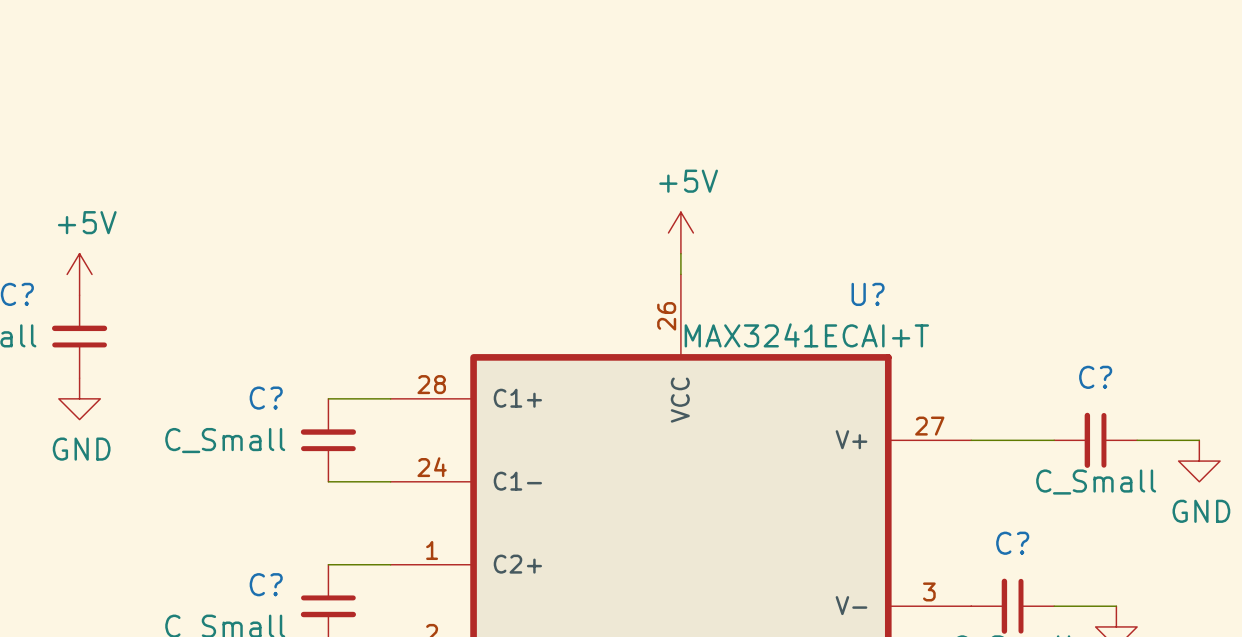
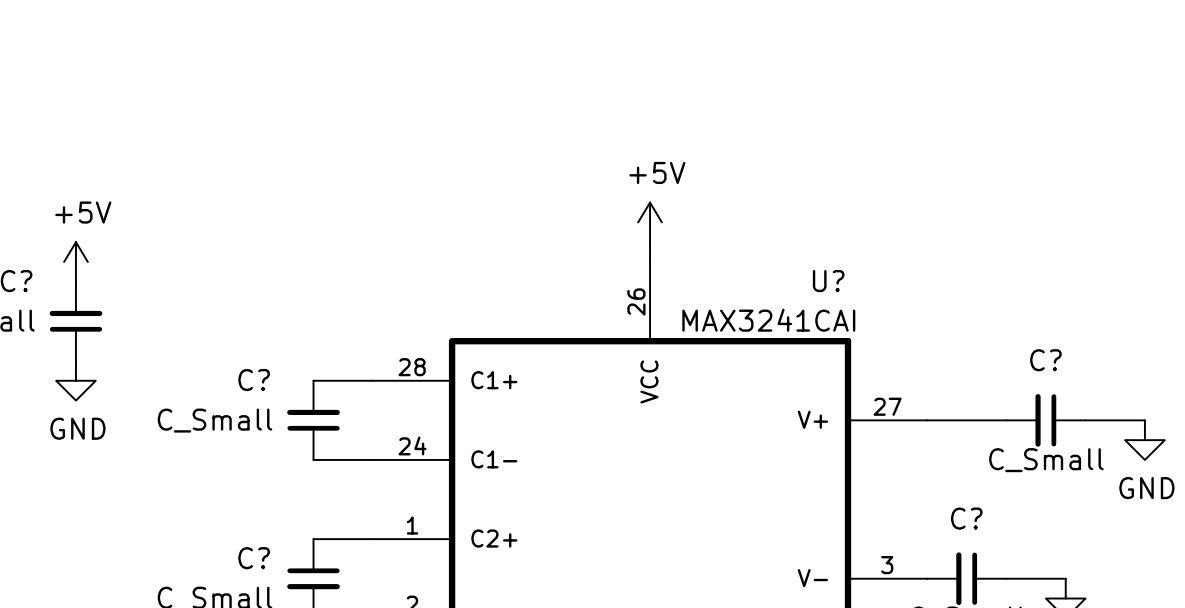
U? value: MAX3241ECAI+T (806, 335) -> MAX3241CAI (768, 320)

